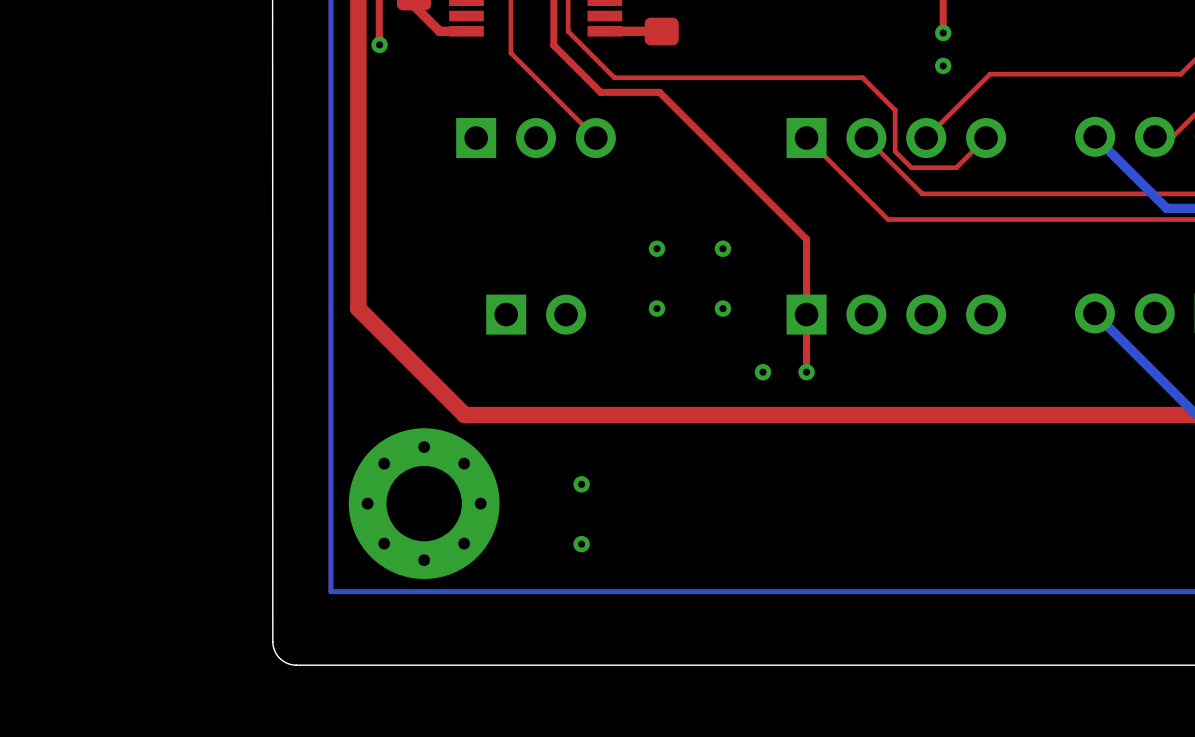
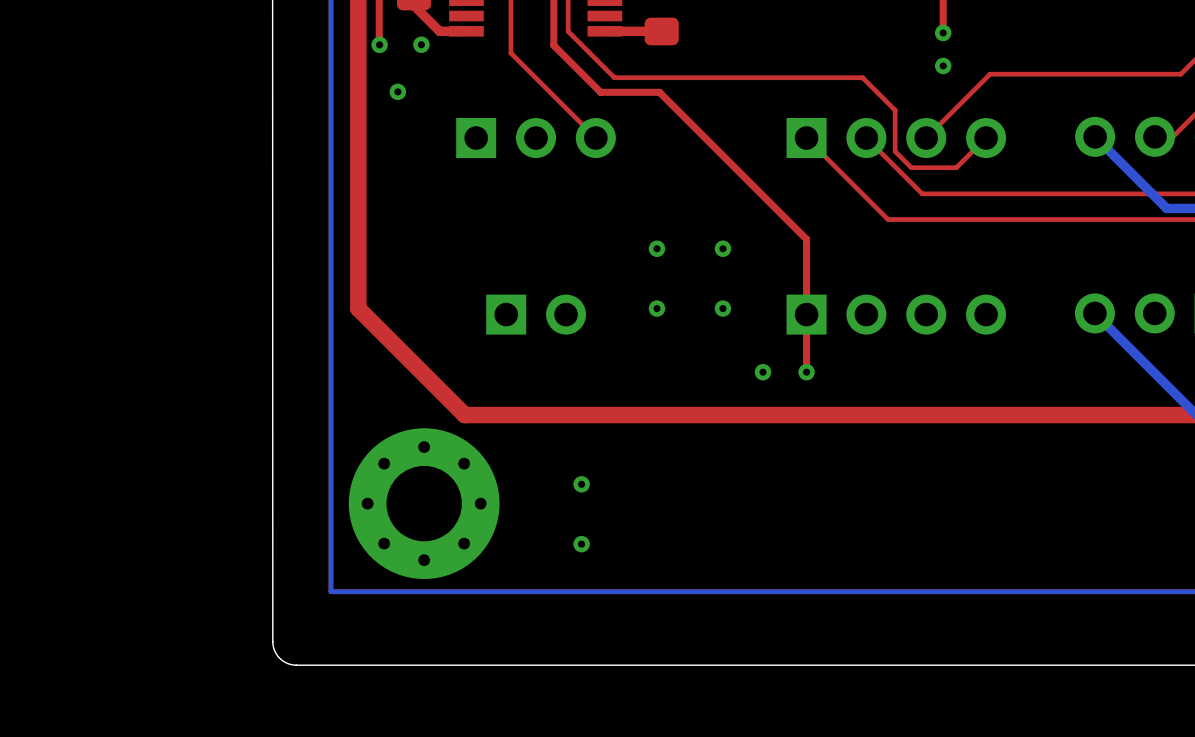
via: none -> (421, 44)
via: none -> (397, 91)

